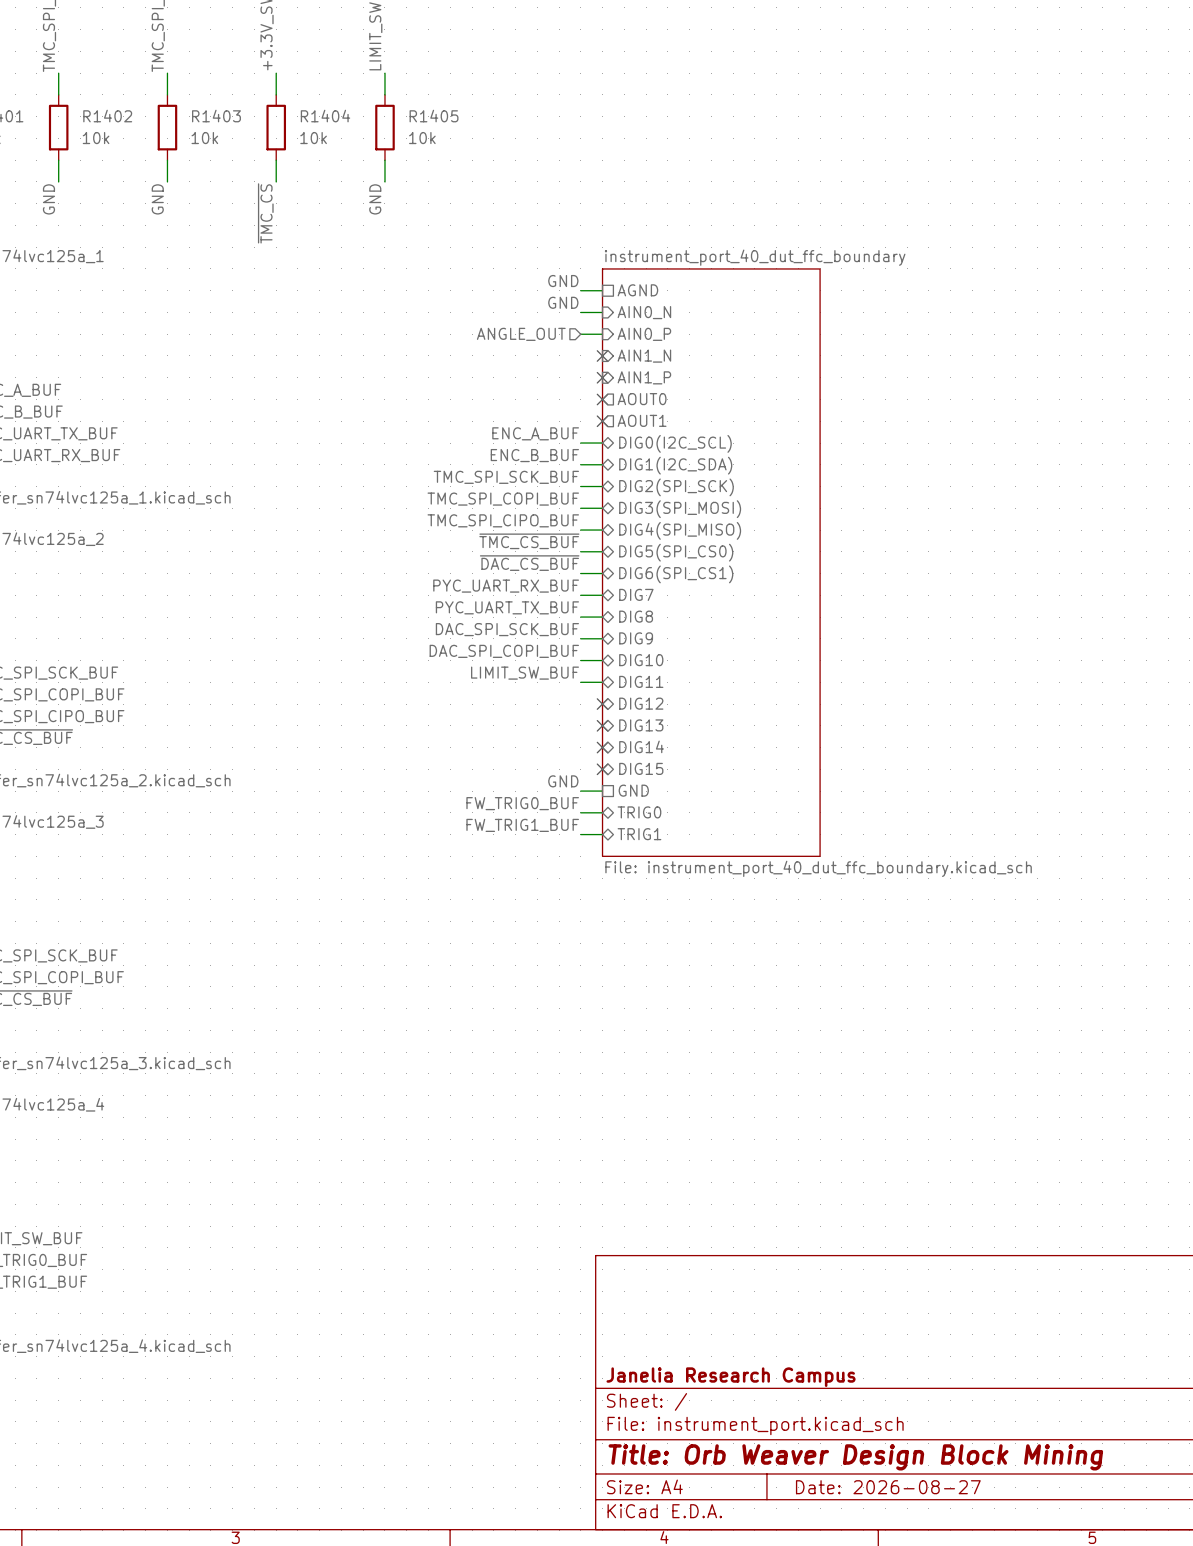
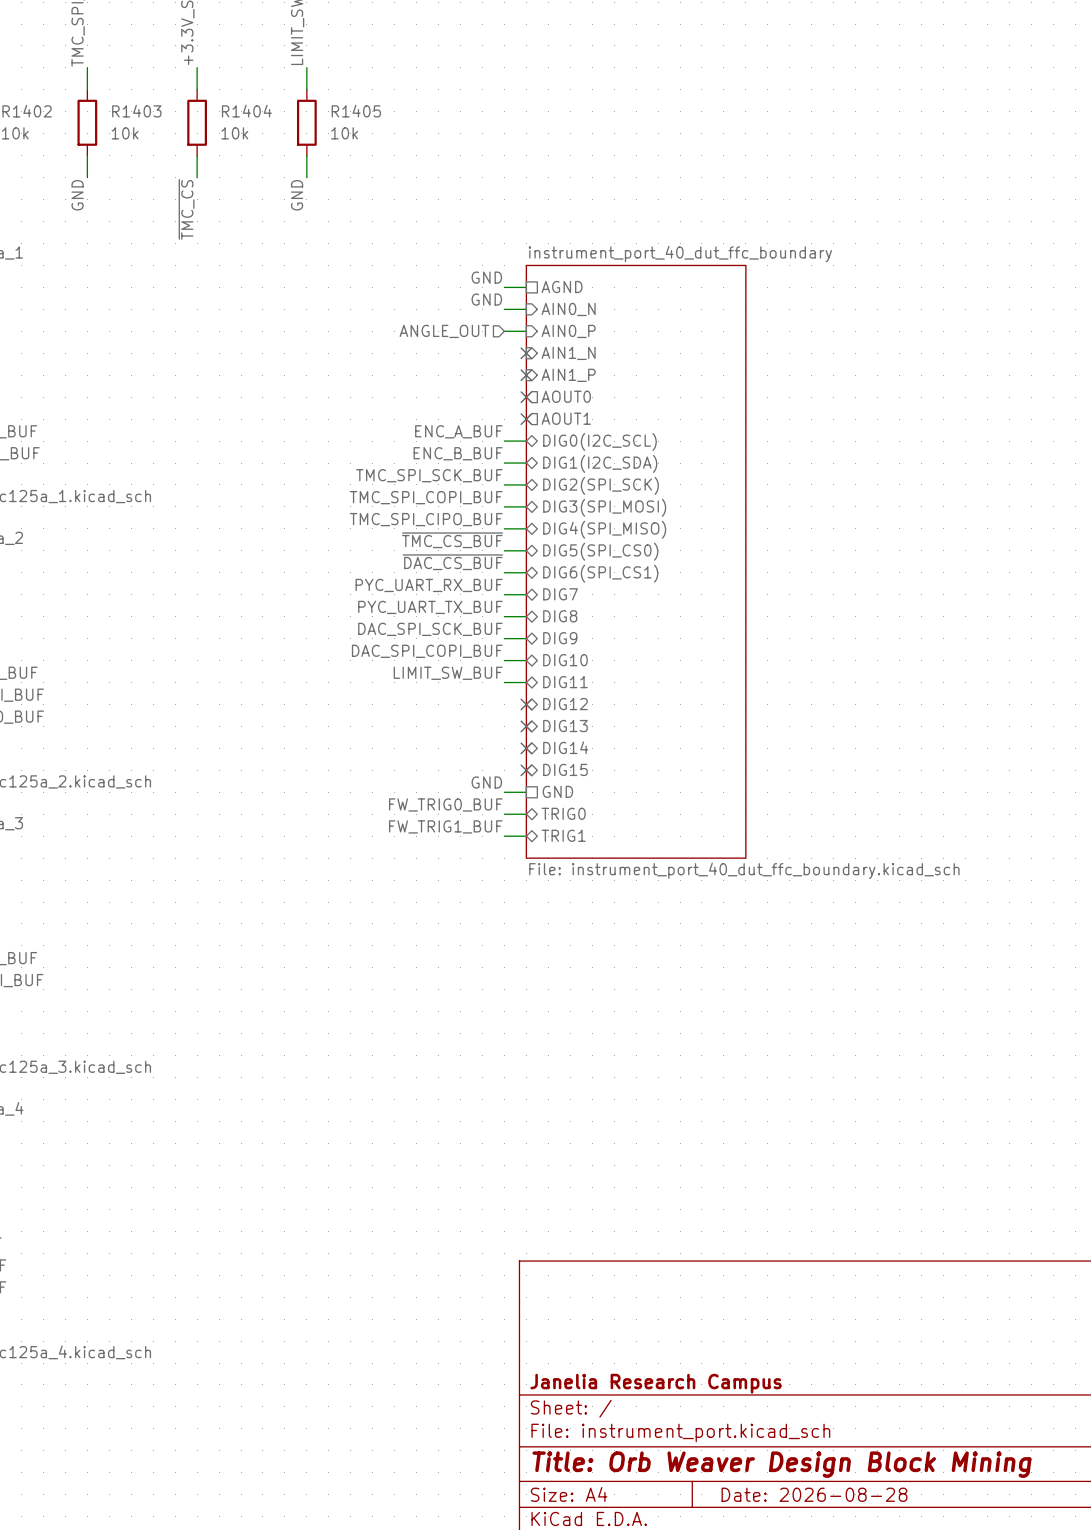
title block: Date: 2026-08-27 (888, 1487) -> Date: 2026-08-28 (814, 1494)

